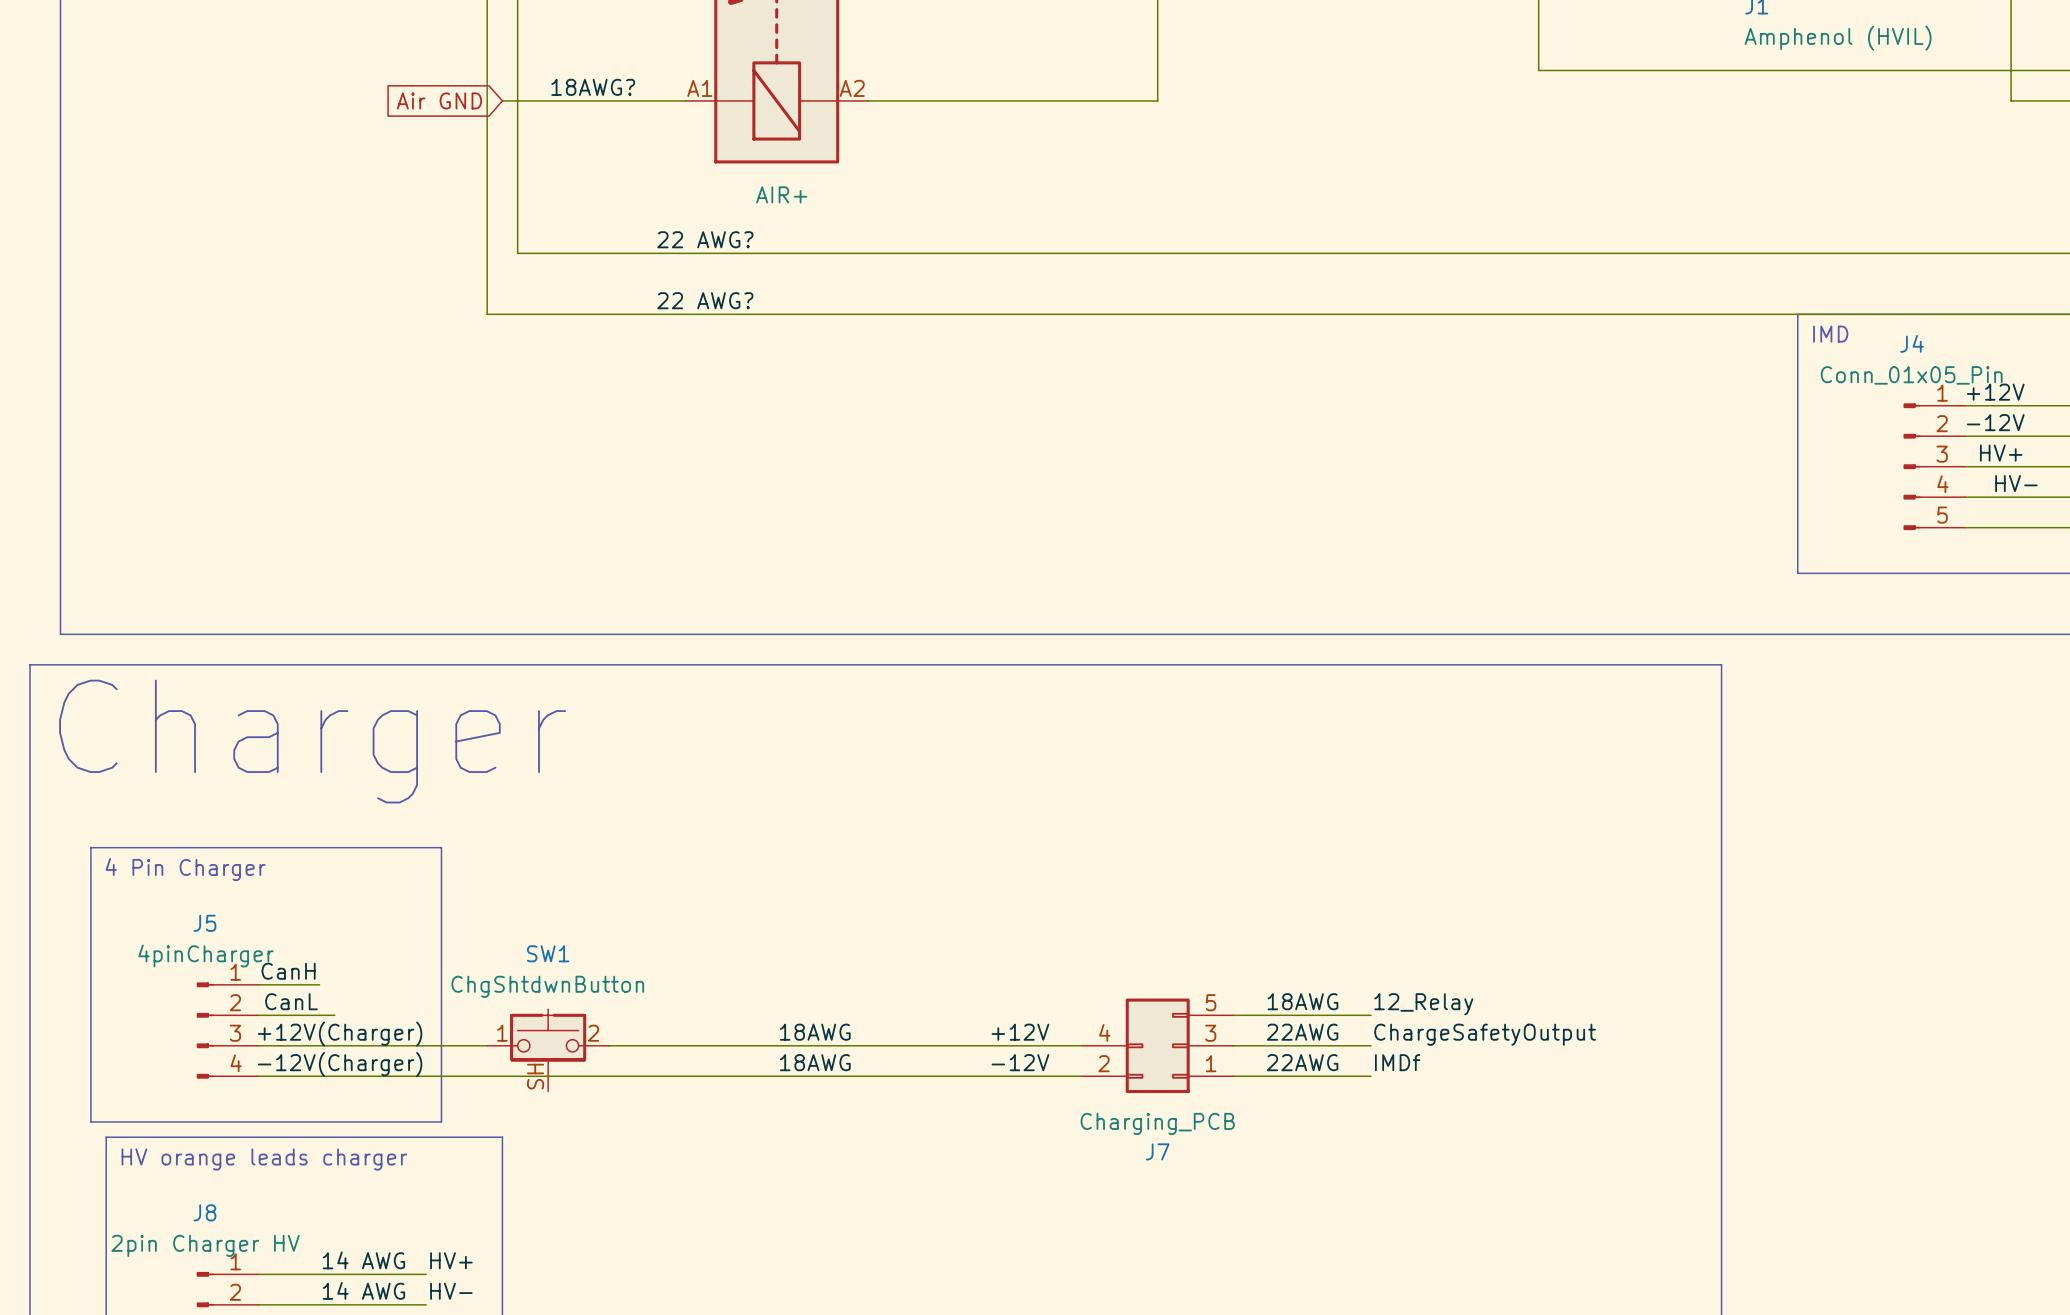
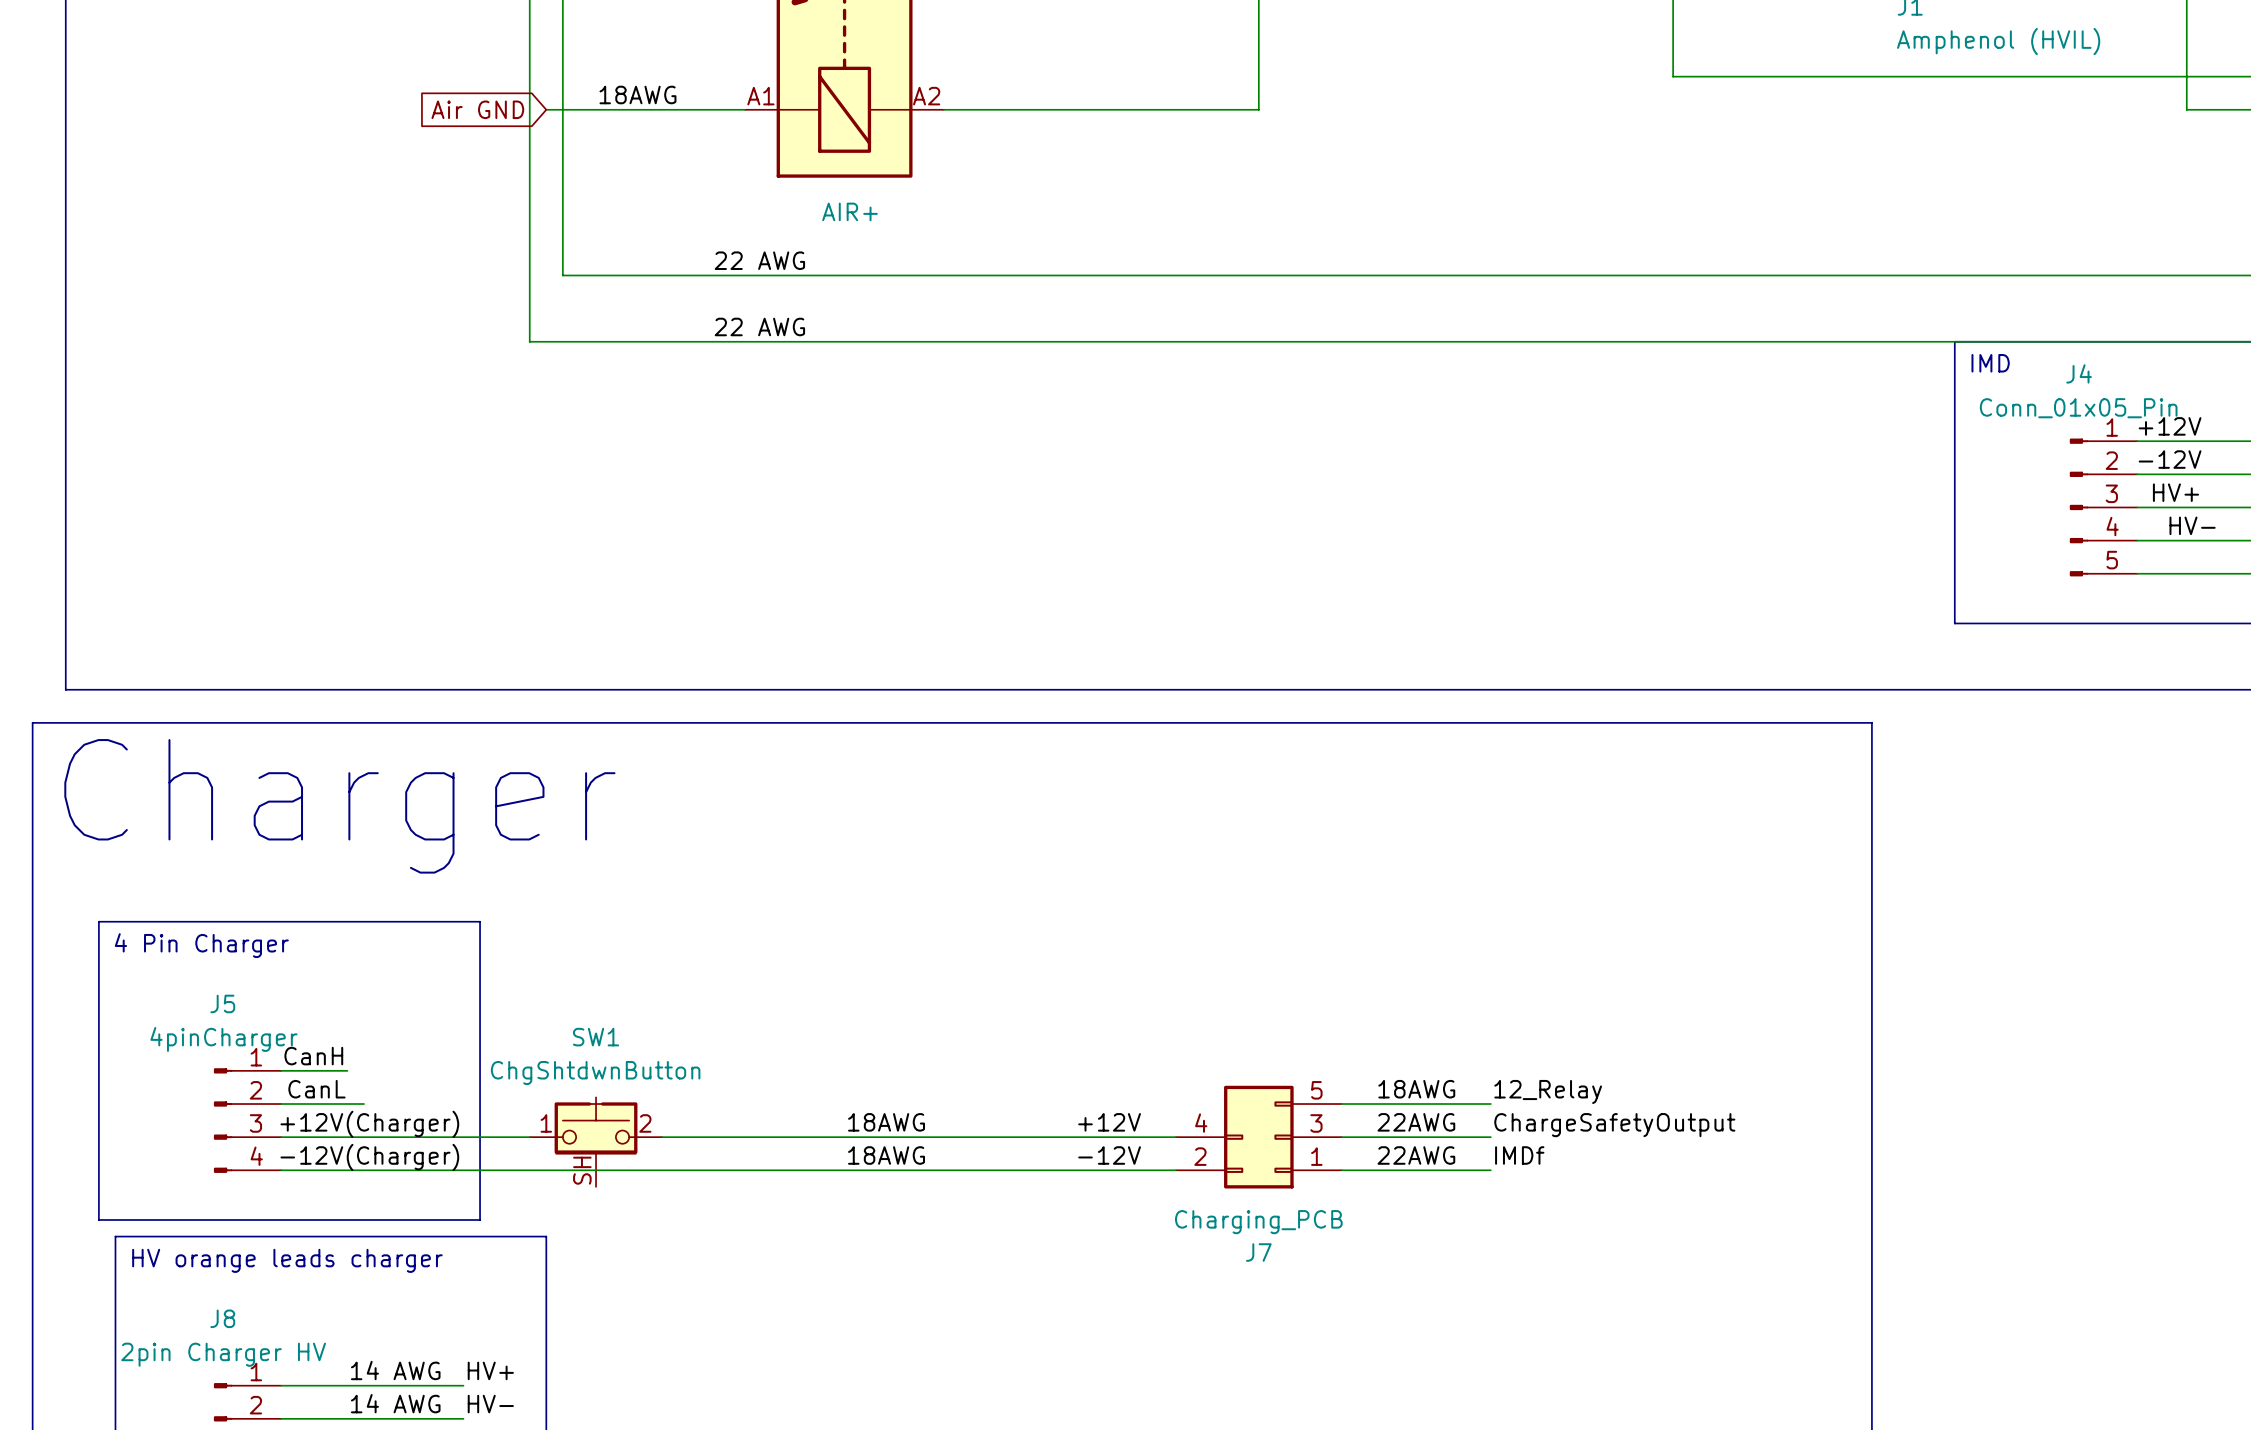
label: 18AWG? (593, 87) -> 18AWG (637, 95)
label: 22 AWG? (705, 239) -> 22 AWG (759, 260)
label: 22 AWG? (705, 300) -> 22 AWG (759, 326)

